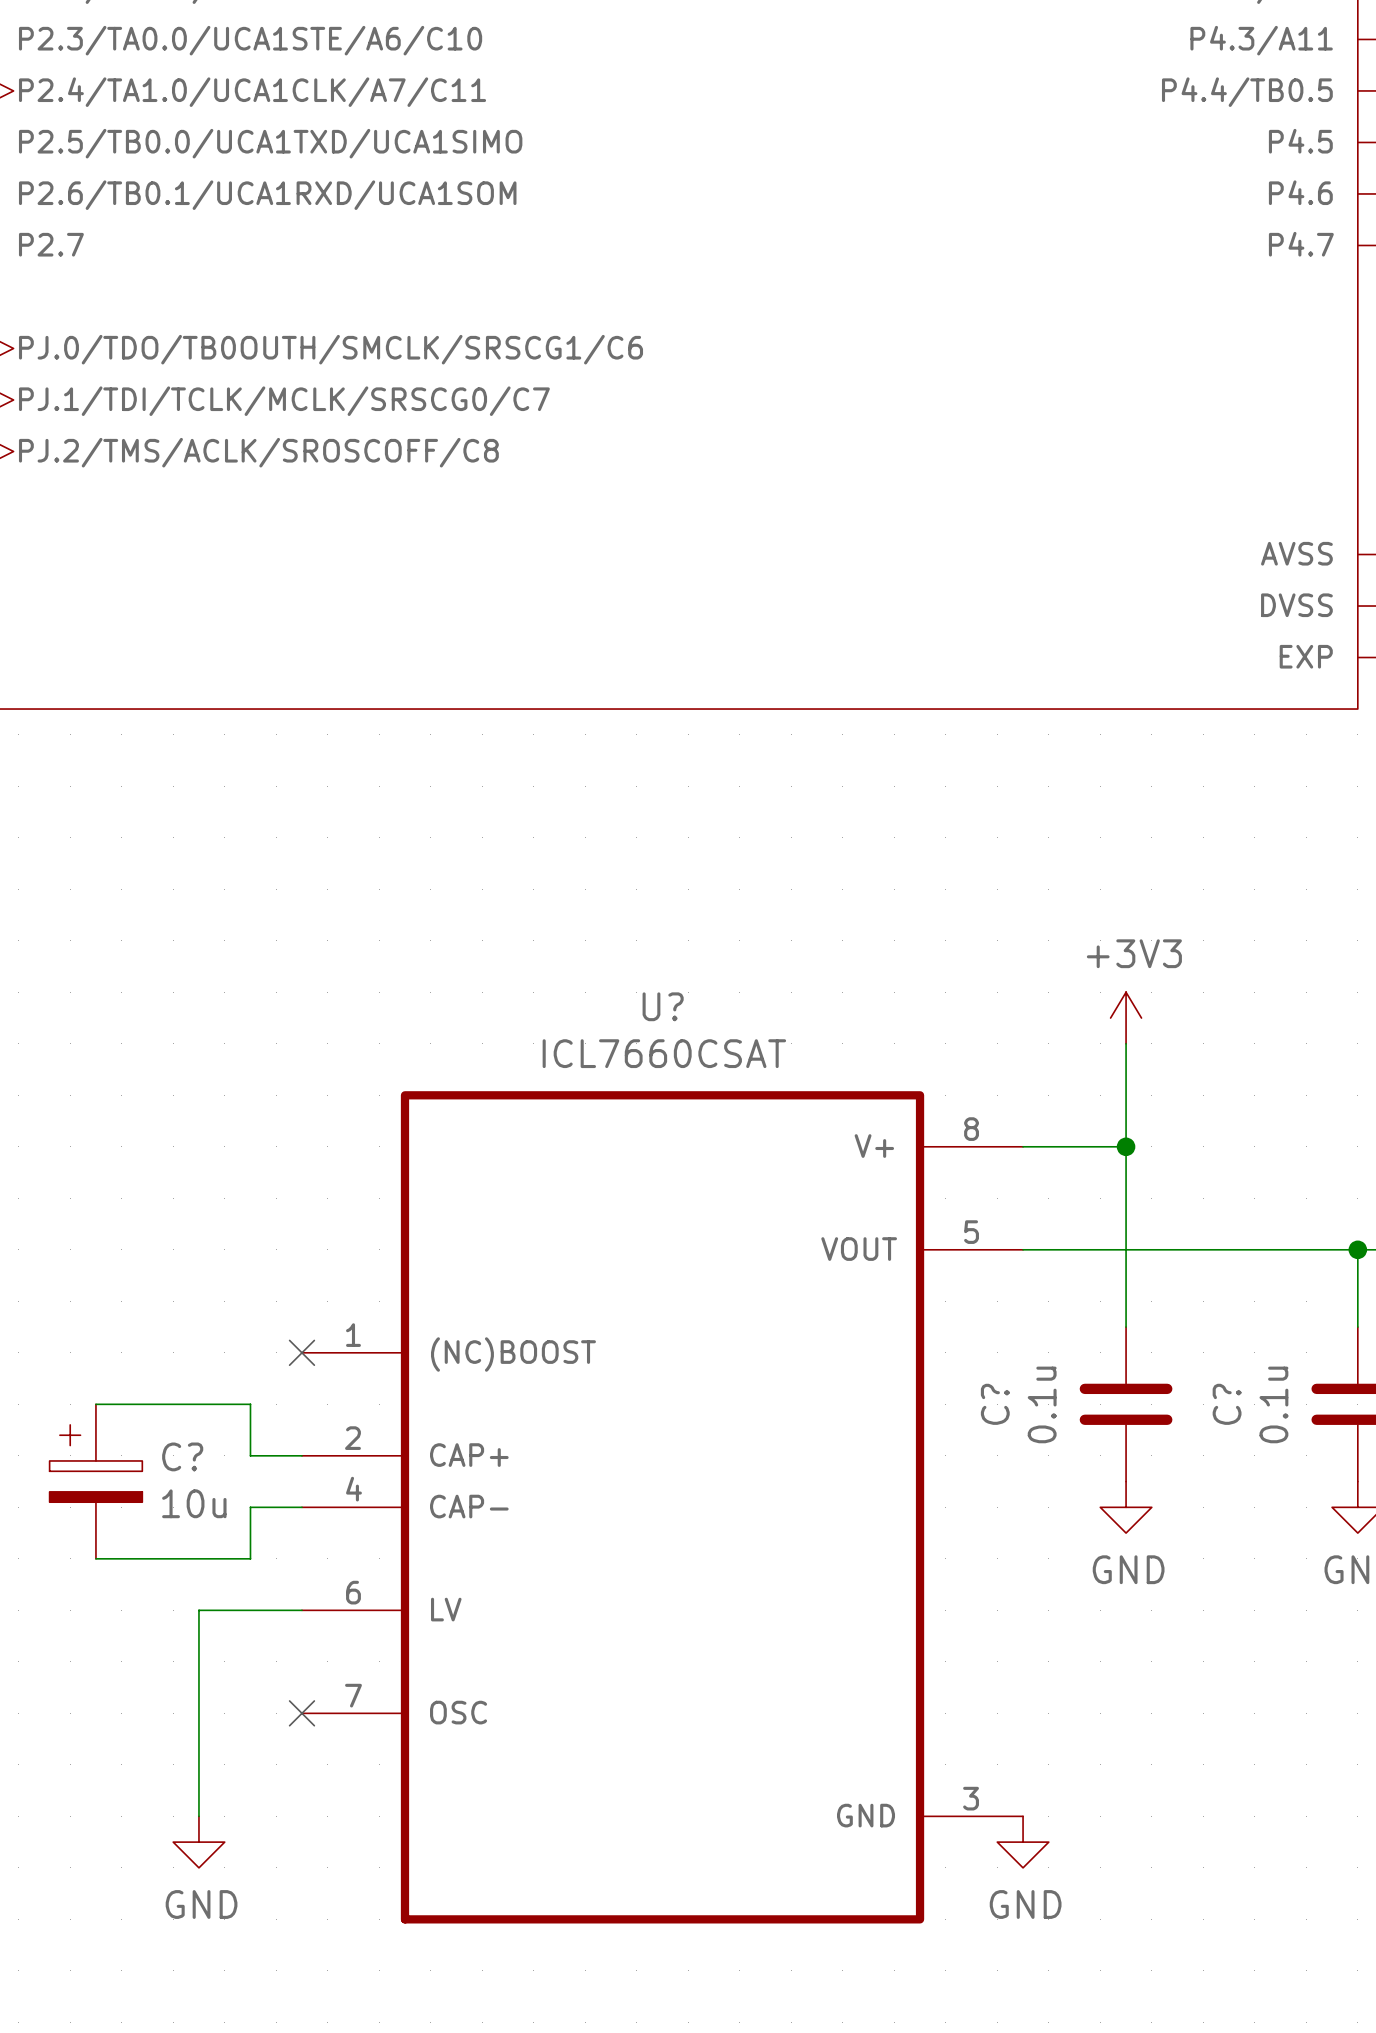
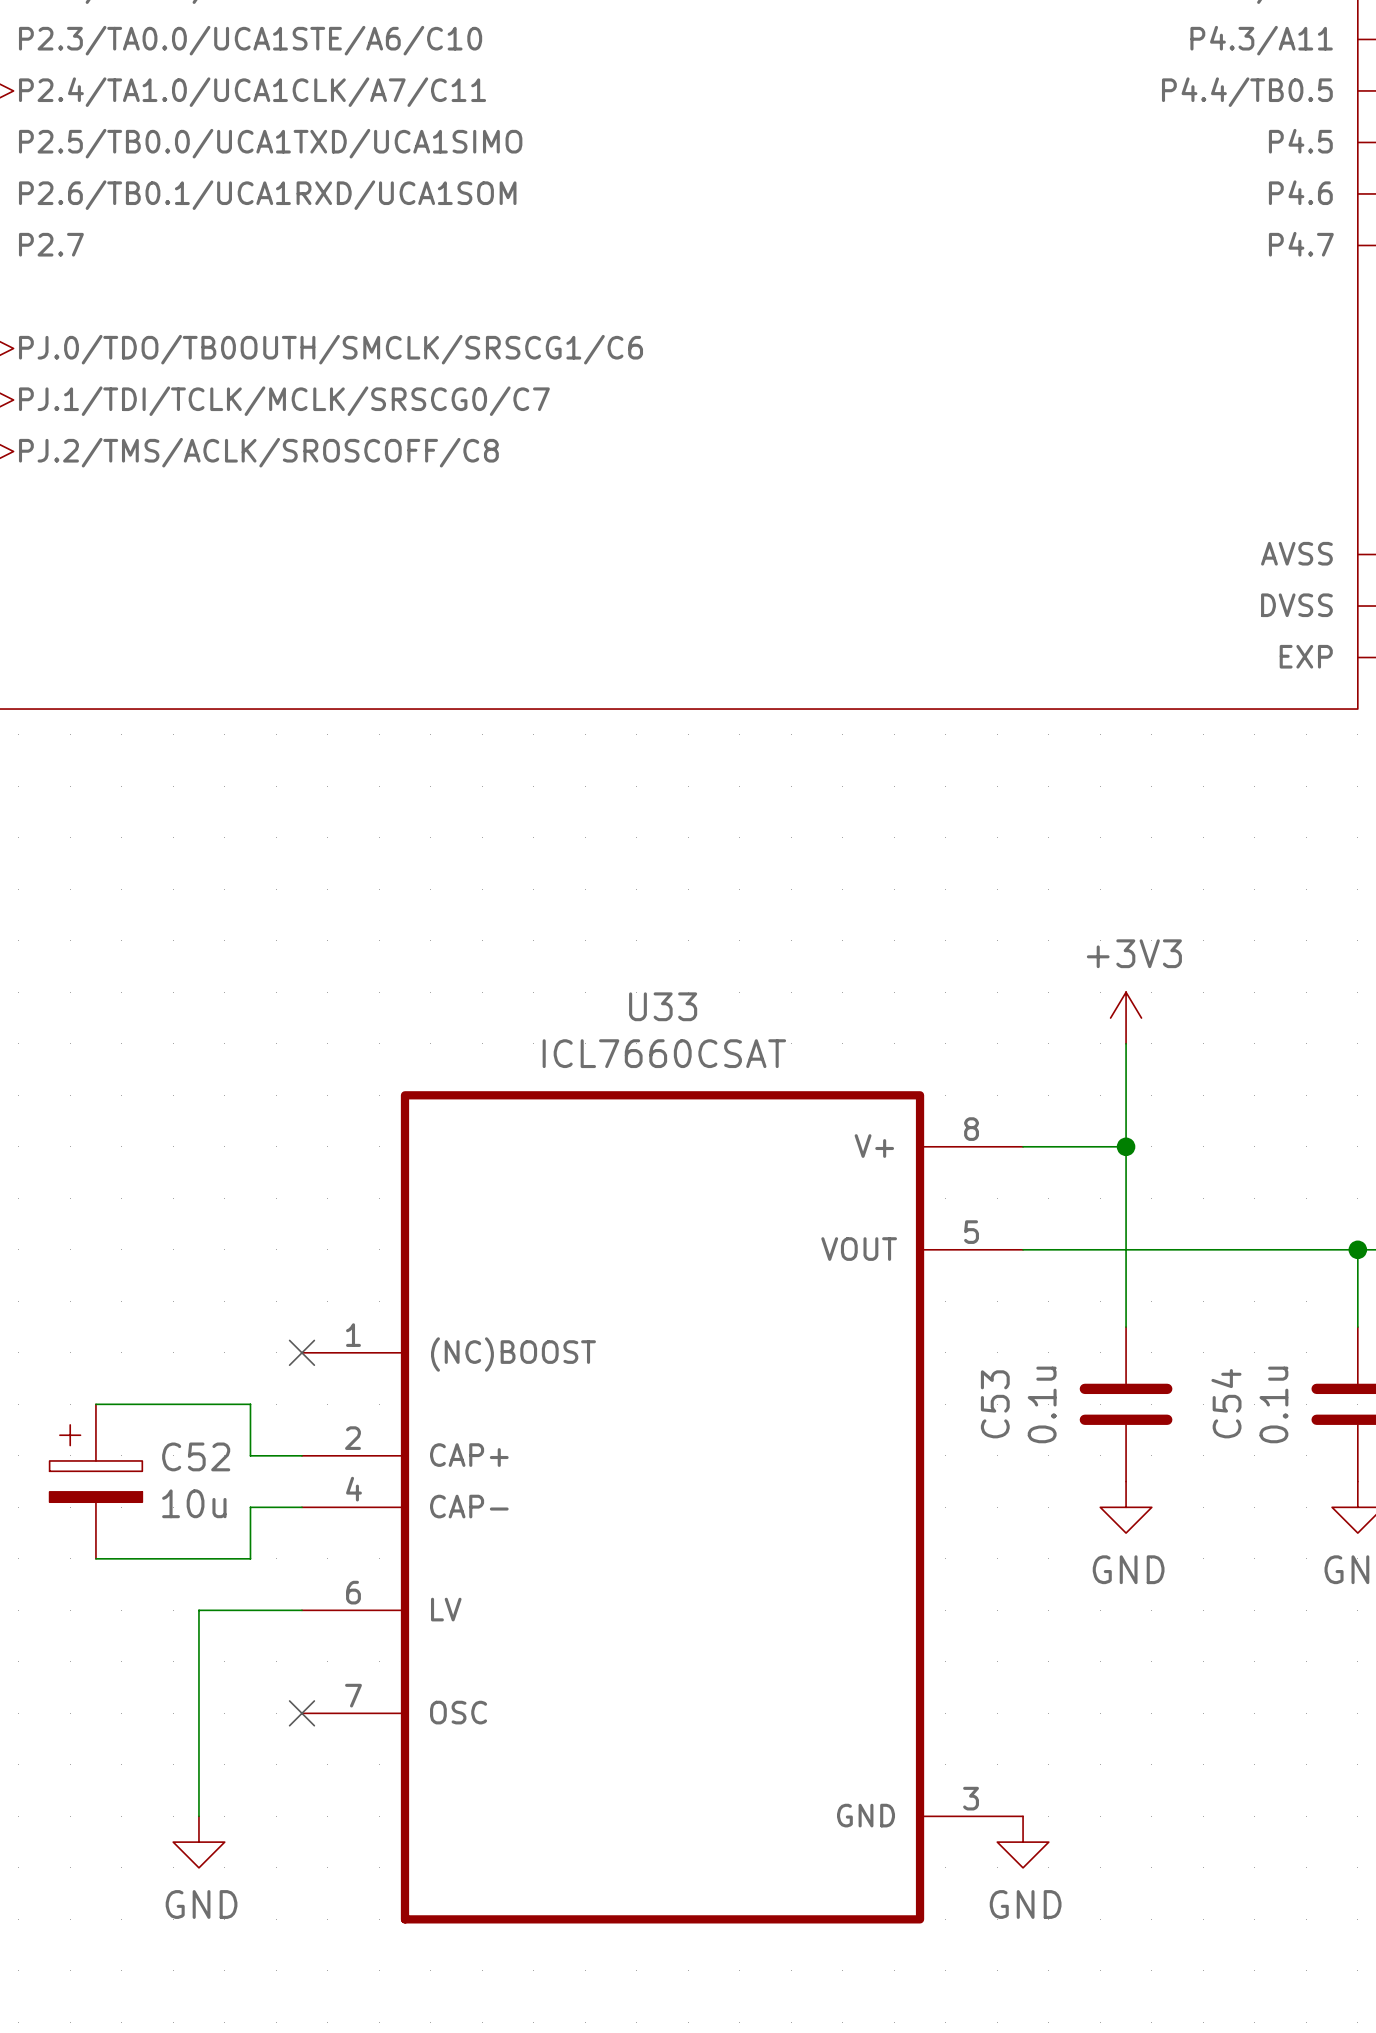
U? name: U? (663, 1006) -> U33 (663, 1006)
C? name: C? (995, 1404) -> C53 (995, 1404)
C? name: C? (1227, 1404) -> C54 (1226, 1403)
C? name: C? (182, 1456) -> C52 (196, 1456)

